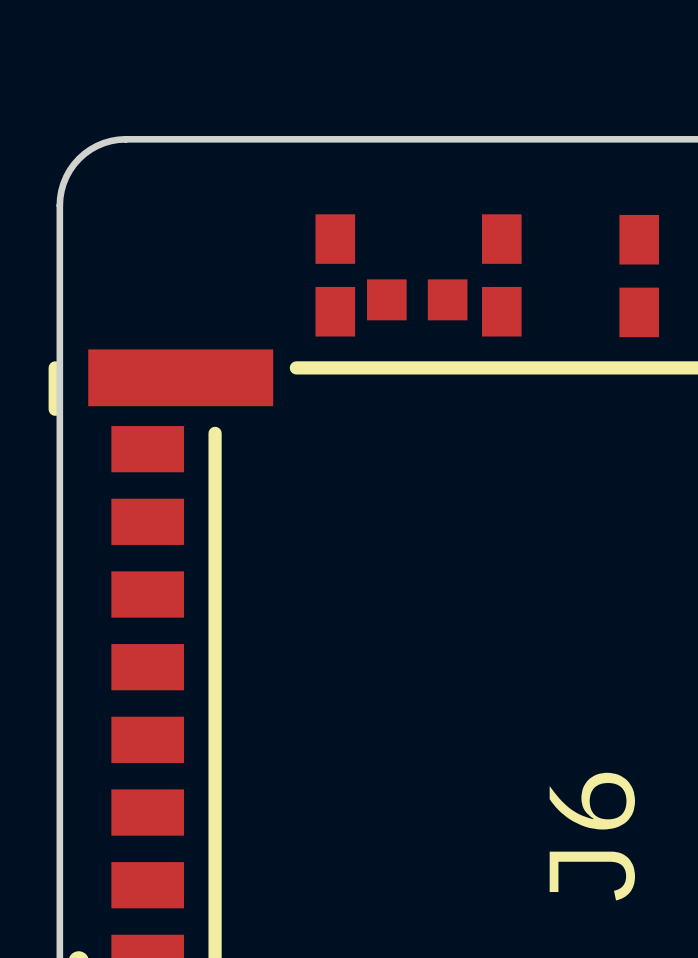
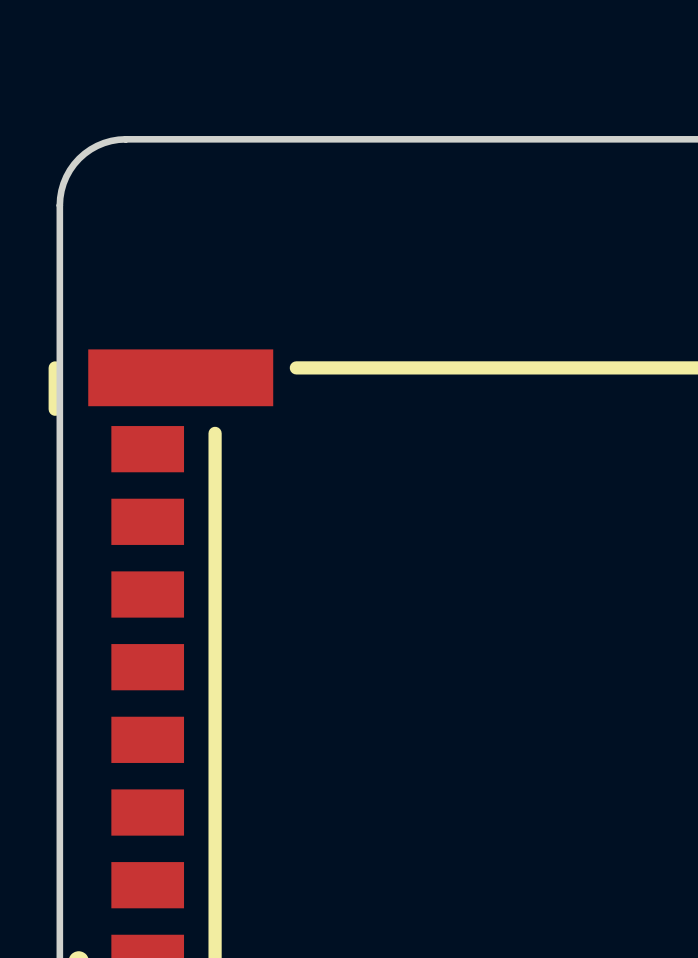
part: (335, 275) -> none
part: (501, 275) -> none
part: (639, 276) -> none
part: (417, 299) -> none
J6 name: J6 (592, 836) -> none

